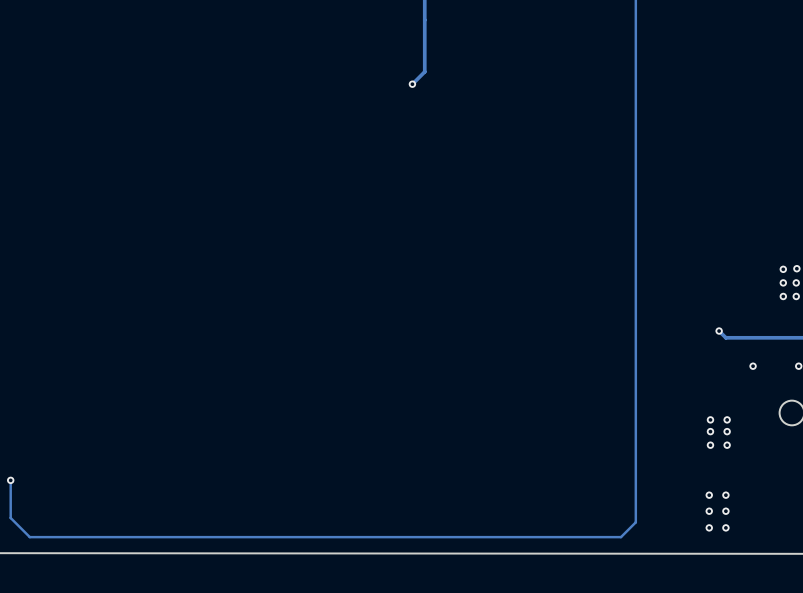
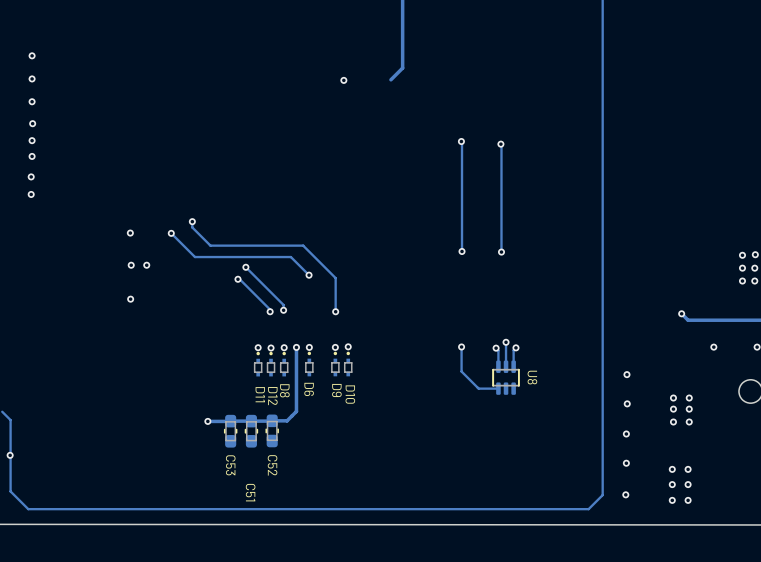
via: none -> (32, 55)
via: none -> (32, 78)
via: none -> (343, 80)
via: (412, 84) -> none
via: none -> (32, 101)
via: none -> (32, 123)
via: none -> (32, 140)
track: none -> (461, 141) (462, 251)
via: none -> (461, 141)
track: none -> (500, 144) (501, 252)
via: none -> (500, 144)
via: none -> (32, 156)
via: none -> (31, 176)
via: none -> (31, 194)
track: none -> (192, 221) (192, 227) (210, 245) (303, 245) (335, 278) (335, 311)
via: none -> (192, 221)
via: none -> (130, 233)
track: none -> (171, 233) (194, 257) (290, 257) (309, 275)
via: none -> (171, 233)
via: none -> (462, 251)
via: none -> (501, 252)
via: none -> (131, 265)
via: none -> (146, 265)
track: none -> (245, 267) (283, 305) (283, 310)
via: none -> (245, 267)
via: none -> (309, 275)
track: none -> (237, 279) (270, 311)
via: none -> (237, 279)
via: none -> (130, 299)
via: none -> (283, 310)
via: none -> (270, 311)
via: none -> (335, 311)
track: none -> (506, 342) (506, 366)
via: none -> (506, 342)
via: none -> (348, 346)
via: none -> (258, 347)
via: none -> (284, 347)
track: none -> (296, 347) (296, 411) (287, 420) (207, 421)
via: none -> (296, 347)
via: none -> (309, 347)
via: none -> (335, 347)
track: none -> (461, 346) (461, 371) (478, 388) (498, 388)
via: none -> (461, 346)
track: none -> (515, 347) (513, 350) (513, 366)
via: none -> (515, 347)
via: none -> (271, 348)
track: none -> (496, 348) (498, 350) (498, 366)
via: none -> (496, 348)
D11: none -> (258, 364)
D12: none -> (271, 364)
D8: none -> (284, 364)
D6: none -> (309, 364)
D9: none -> (335, 364)
D10: none -> (348, 364)
via: none -> (626, 374)
U8: none -> (506, 377)
via: none -> (627, 403)
via: none -> (207, 421)
C53: none -> (230, 431)
C51: none -> (251, 431)
C52: none -> (272, 430)
via: none -> (626, 433)
track: (10, 480) (11, 518) -> (2, 411) (10, 420) (10, 491)
via: none -> (626, 463)
via: none -> (625, 494)

